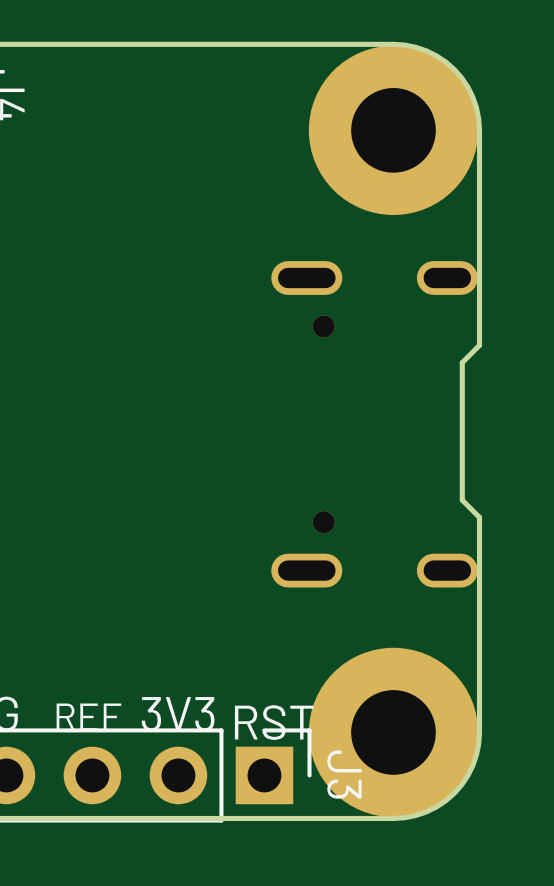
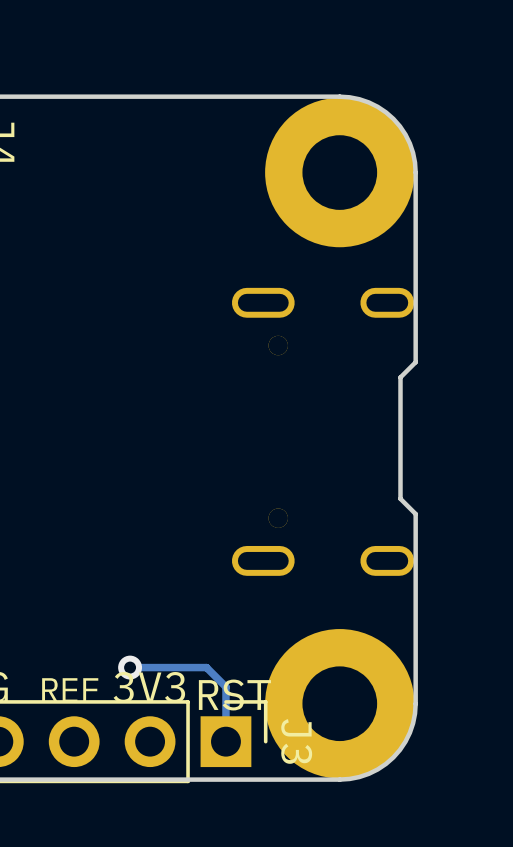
track: none -> (130, 667) (206, 667) (225, 686) (225, 741)
via: none -> (130, 667)

